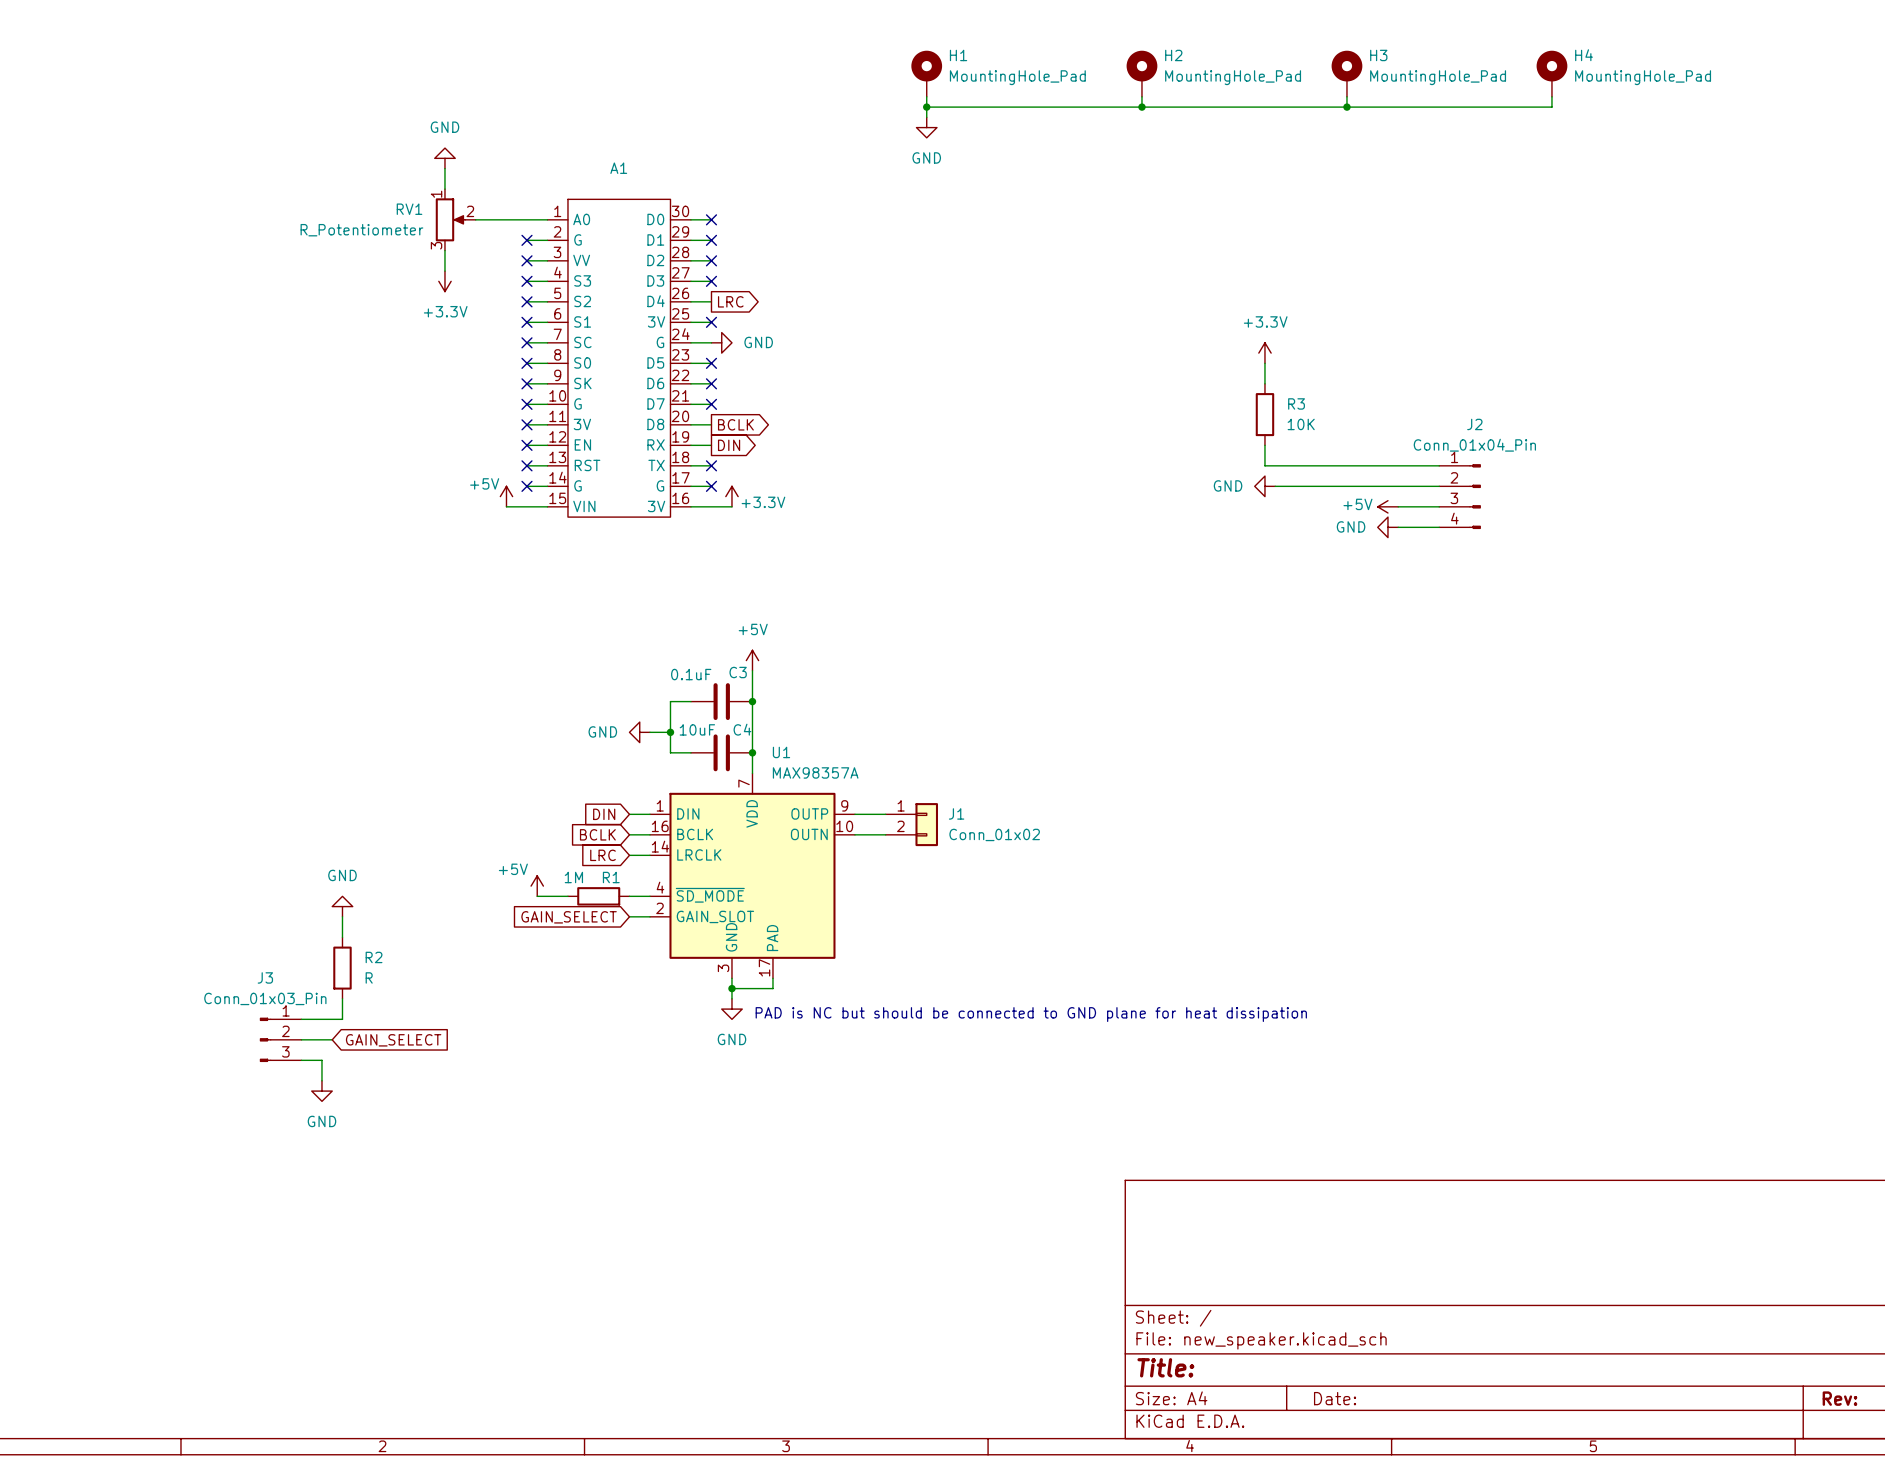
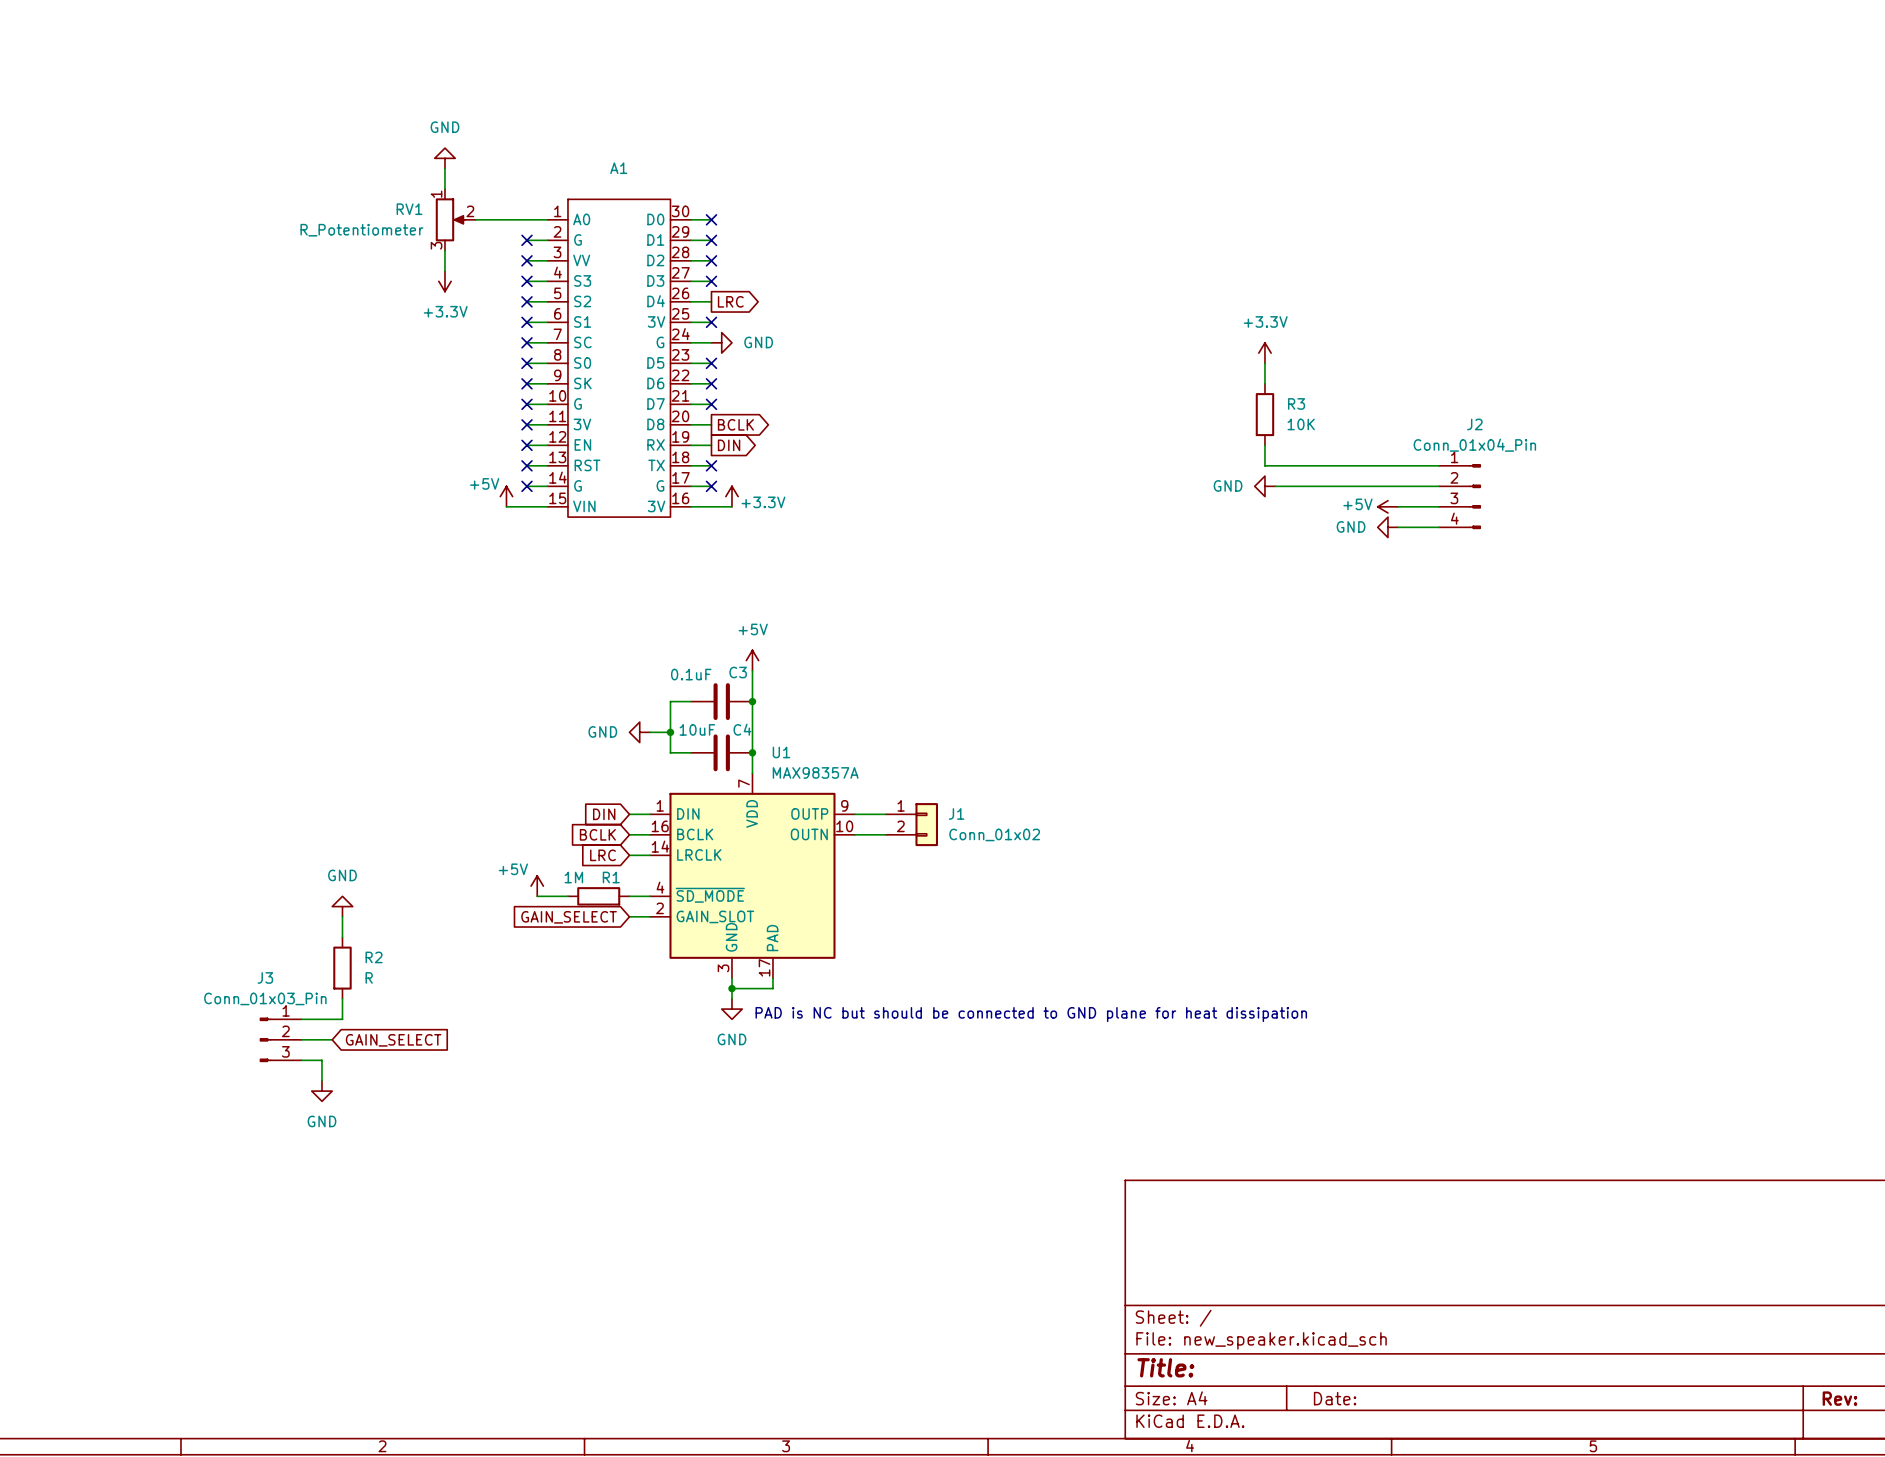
H1: MountingHole_Pad (926, 73) -> none
H2: MountingHole_Pad (1141, 73) -> none
H3: MountingHole_Pad (1346, 73) -> none
H4: MountingHole_Pad (1551, 73) -> none
wire: (926, 96) (926, 117) -> none
wire: (1141, 96) (1141, 107) -> none
wire: (1346, 96) (1346, 107) -> none
wire: (1551, 96) (1551, 107) (926, 107) -> none
junction: (926, 107) -> none
junction: (1141, 107) -> none
junction: (1346, 107) -> none
power symbol: GND (926, 127) -> none

